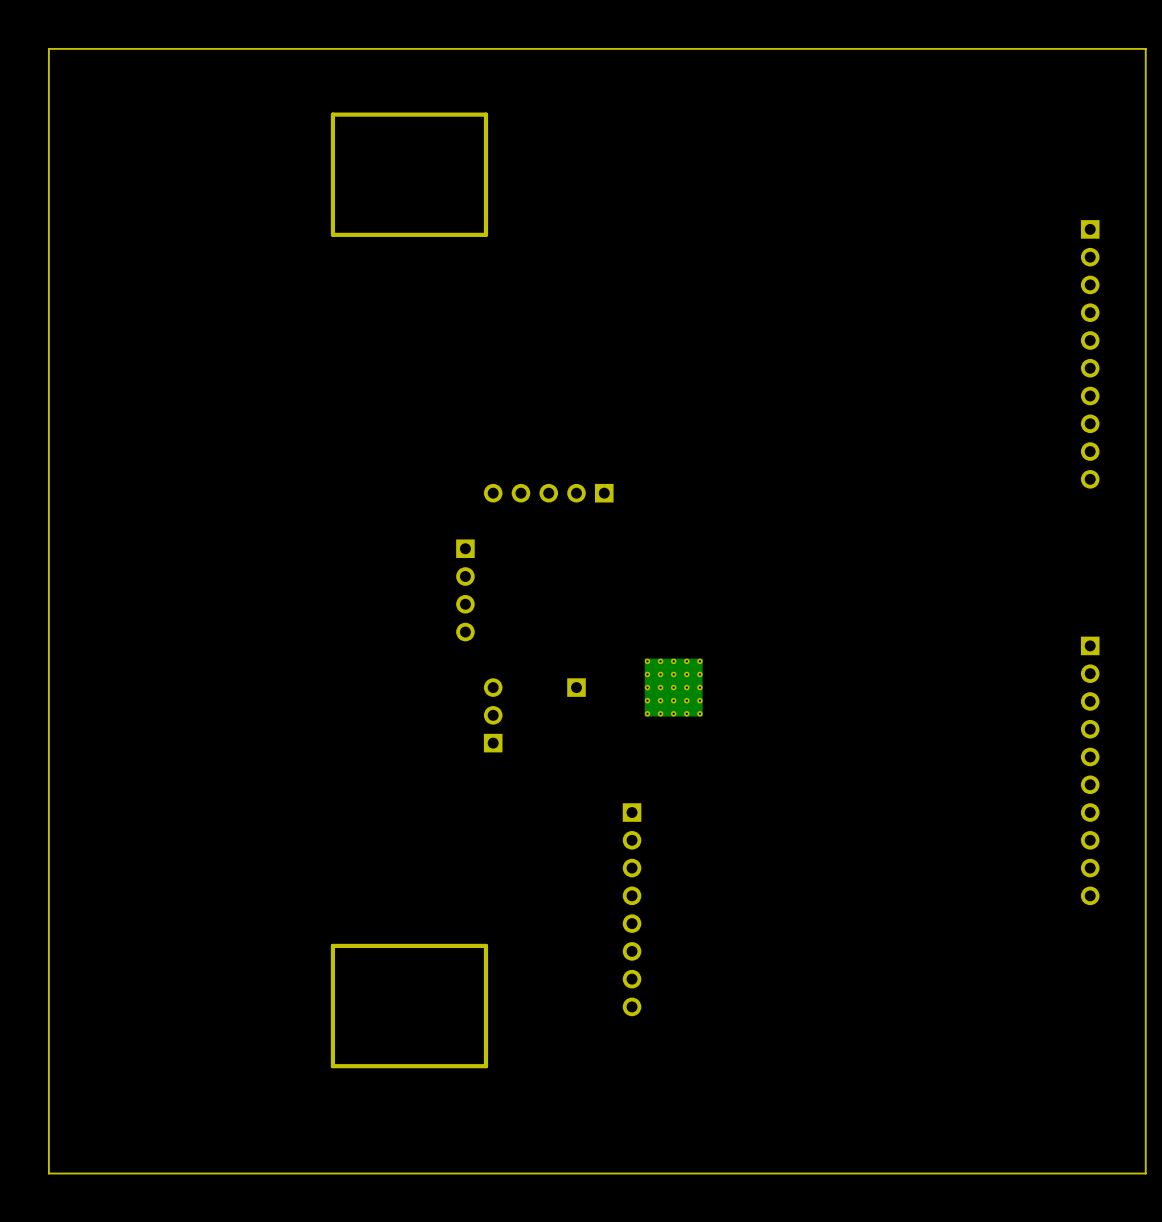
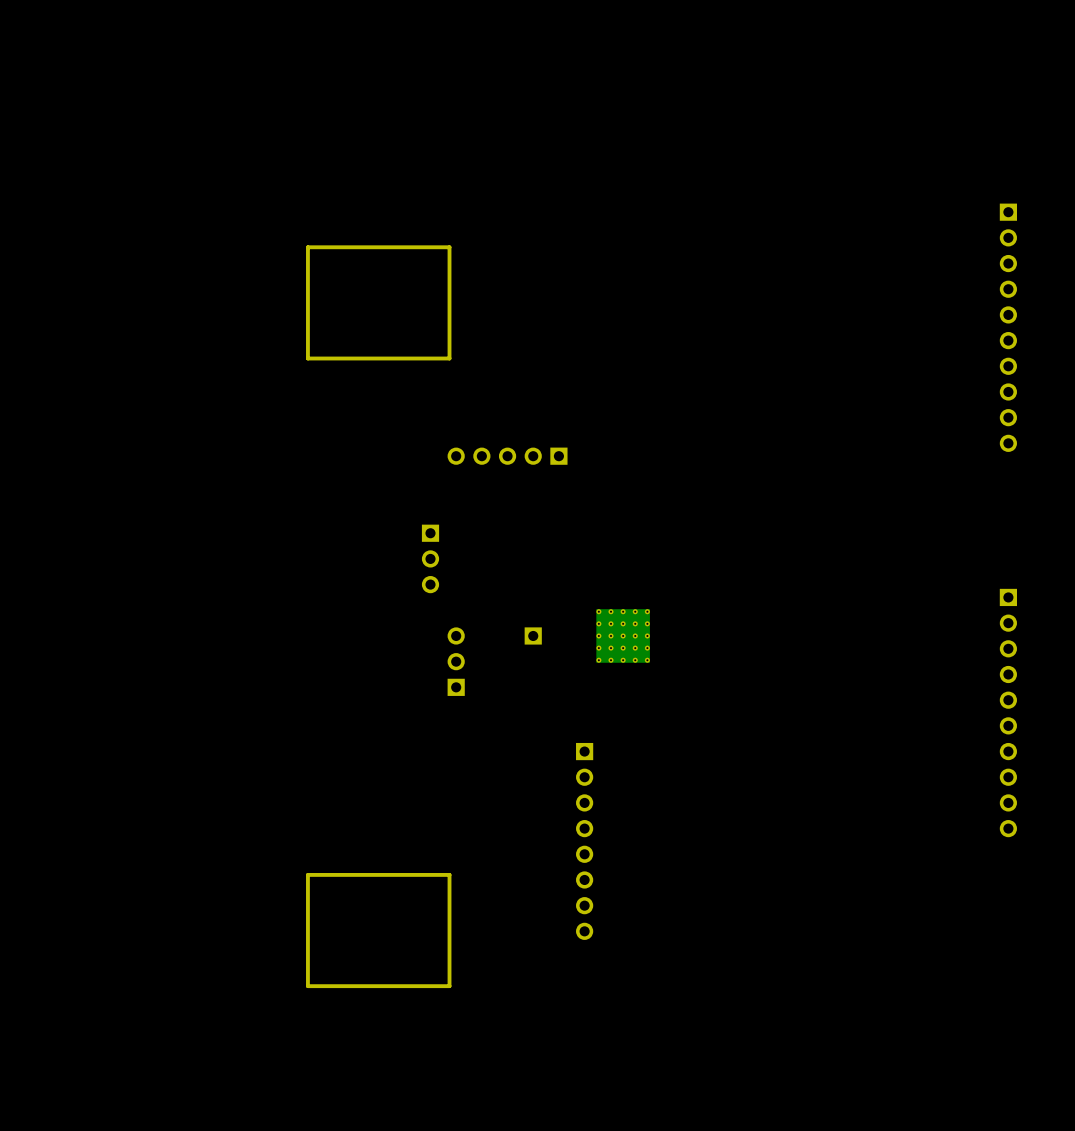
board edge: (1145, 48) (48, 48) (48, 1173) (1145, 1173) (1145, 48) -> none
part position: (409, 174) -> (378, 302)
part: (465, 590) -> none
part: none -> (430, 558)

